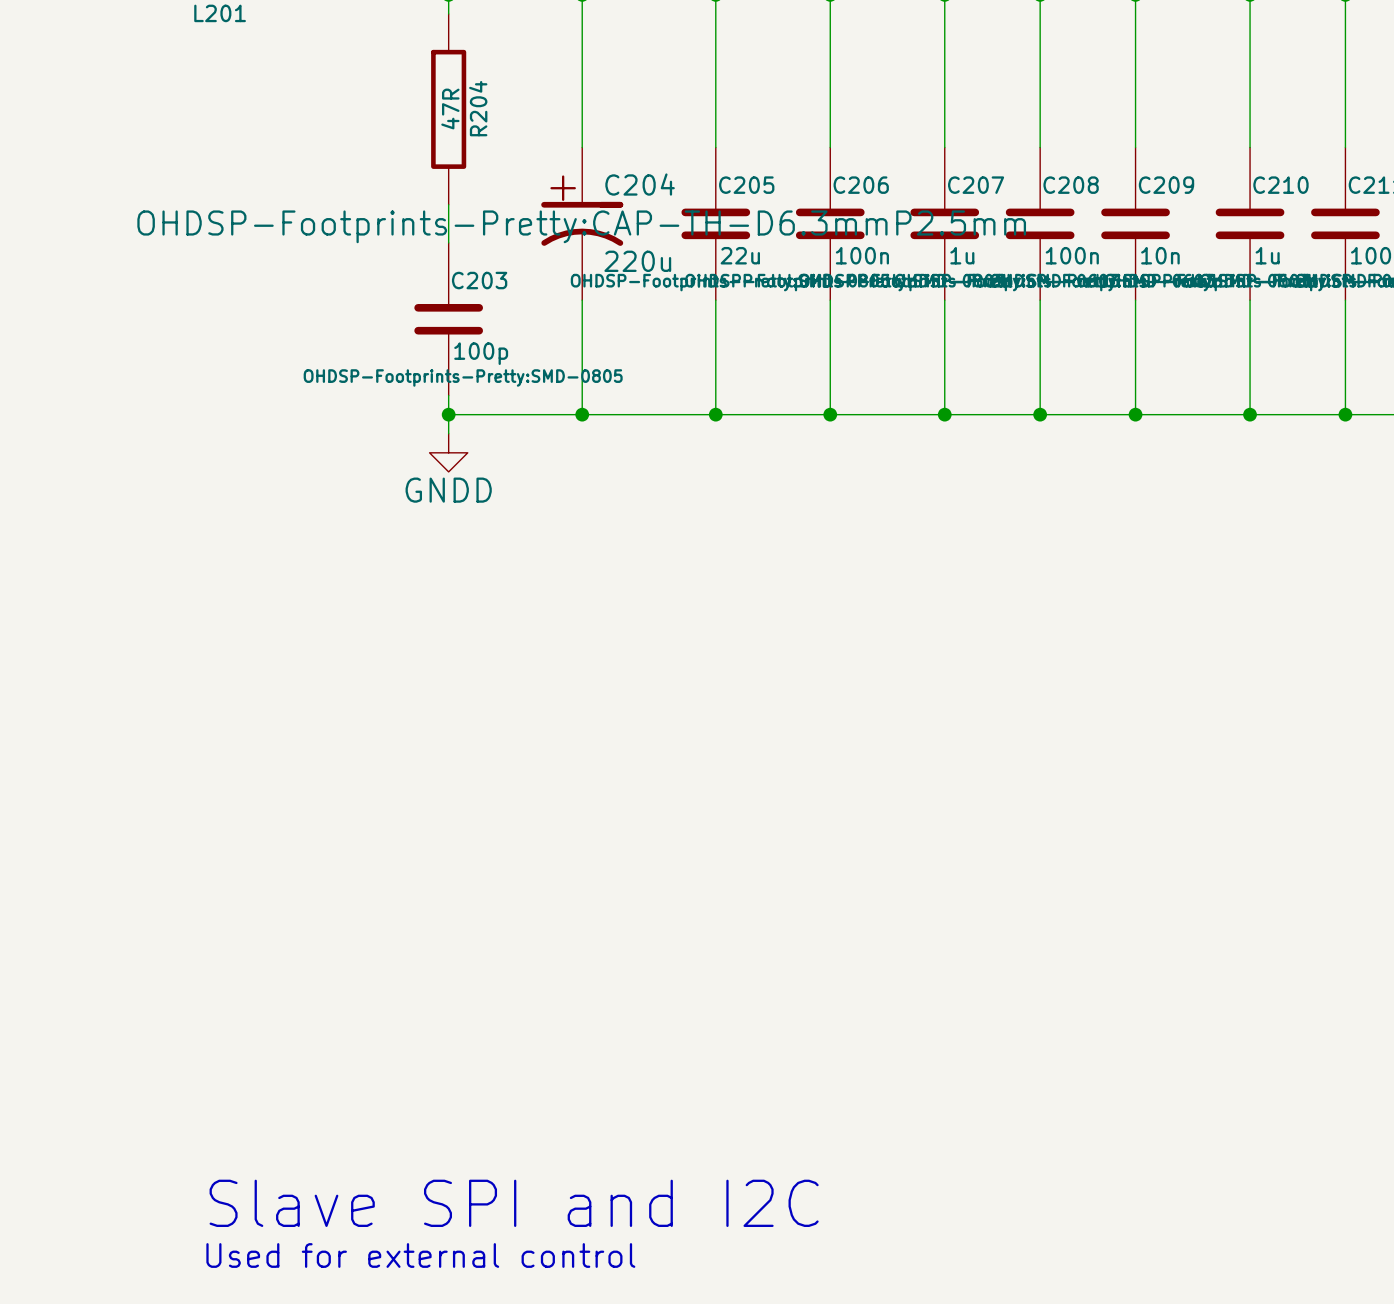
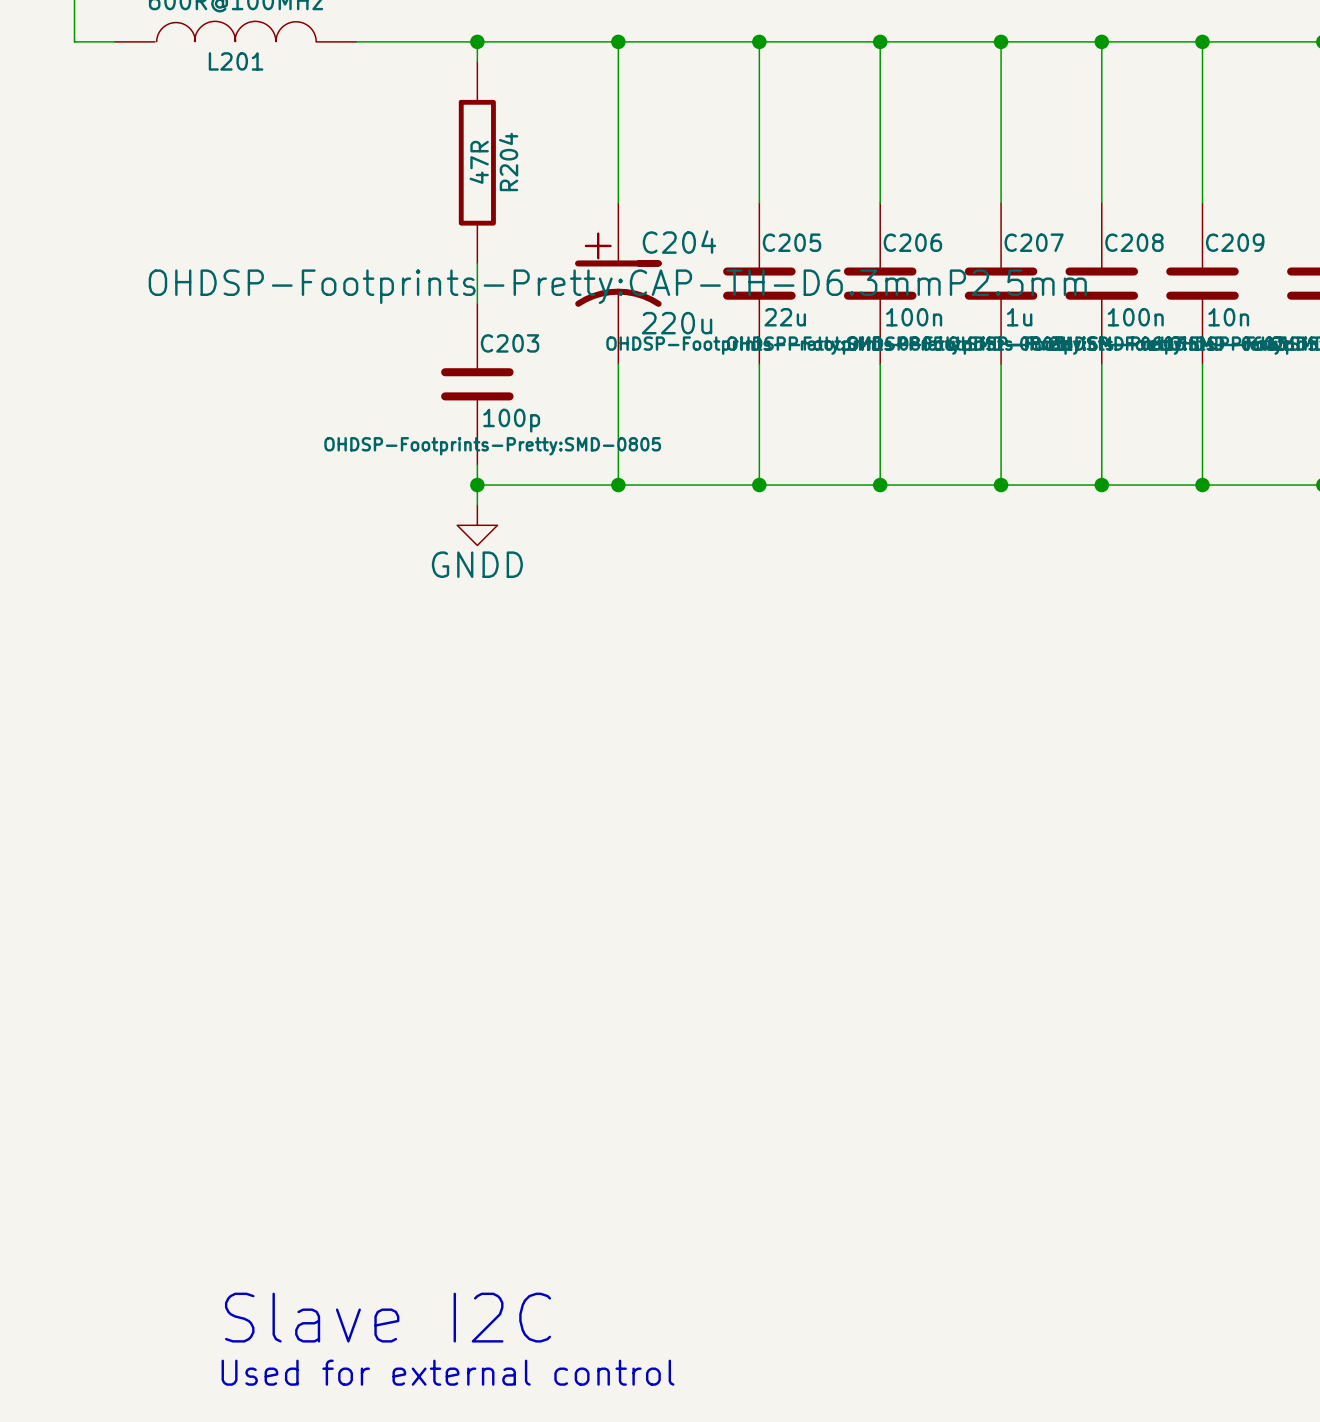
text: Slave SPI and I2C (514, 1203) -> Slave I2C (388, 1317)

